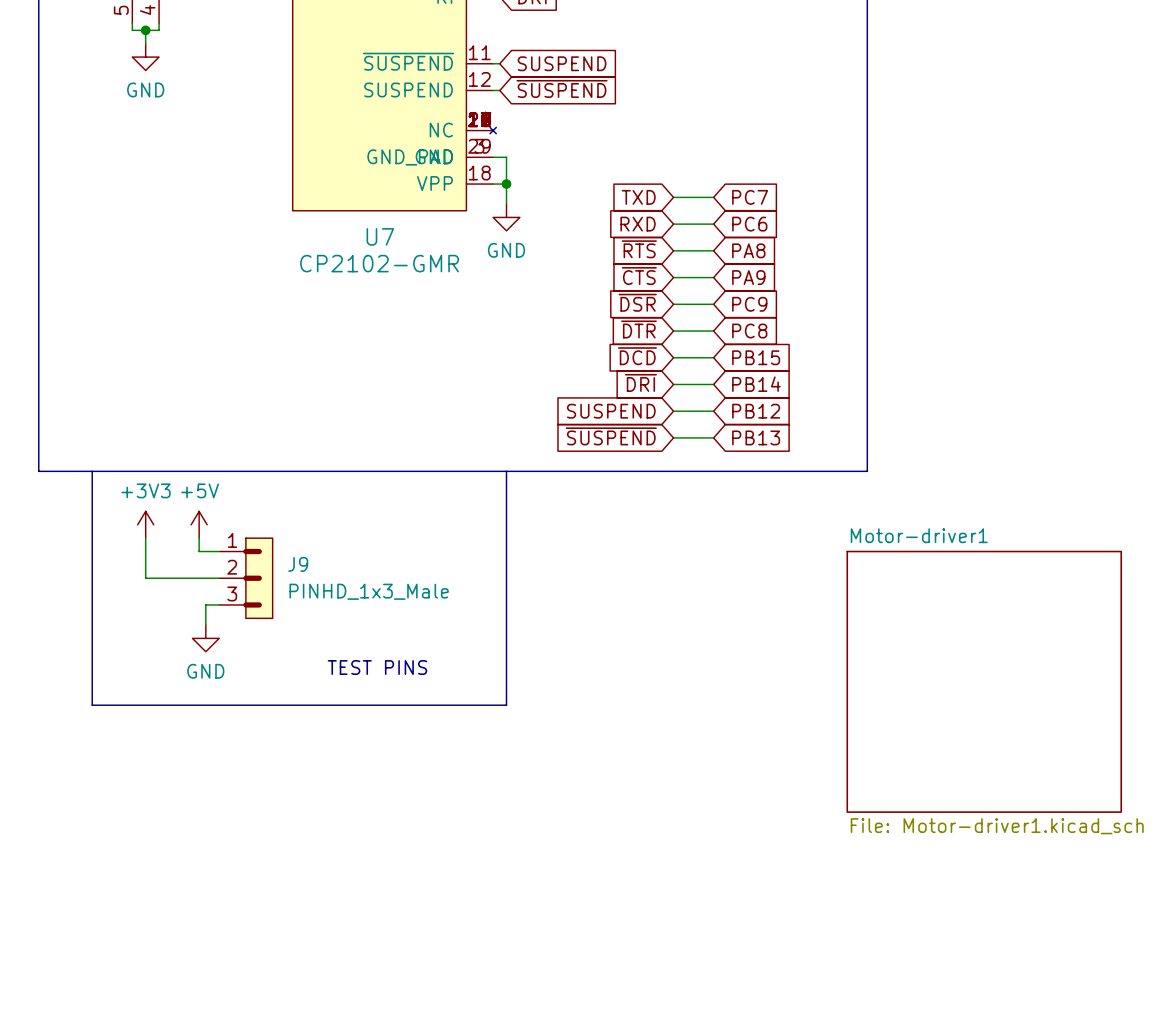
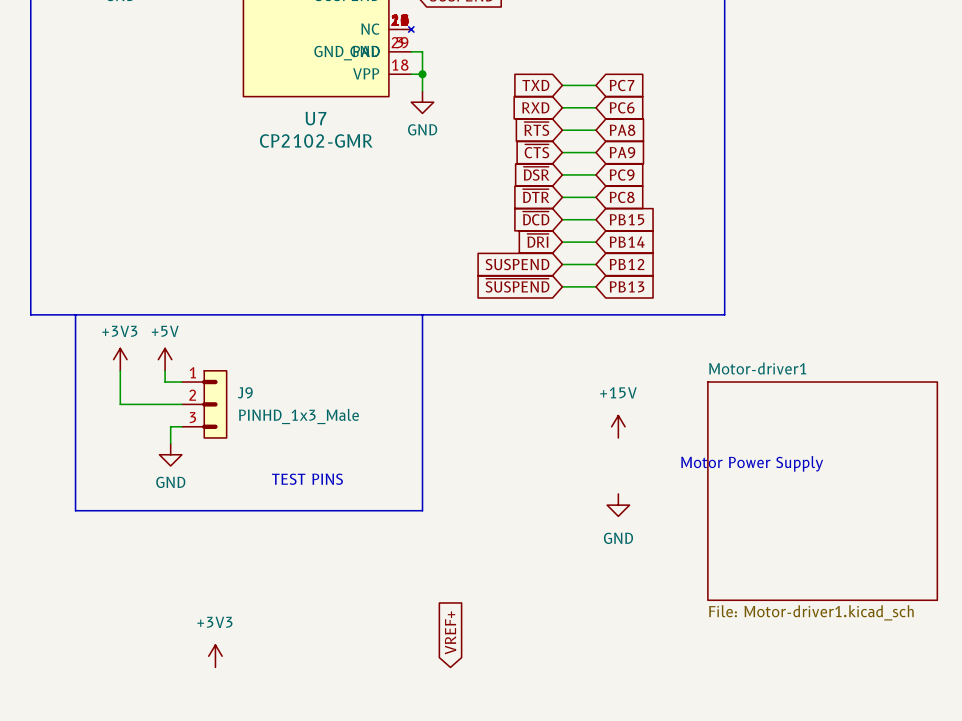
power symbol: none -> +15V (618, 426)
text: none -> Motor Power Supply (752, 463)
power symbol: none -> GND (618, 505)
global label: none -> VREF+ (450, 632)
power symbol: none -> +3V3 (215, 656)

